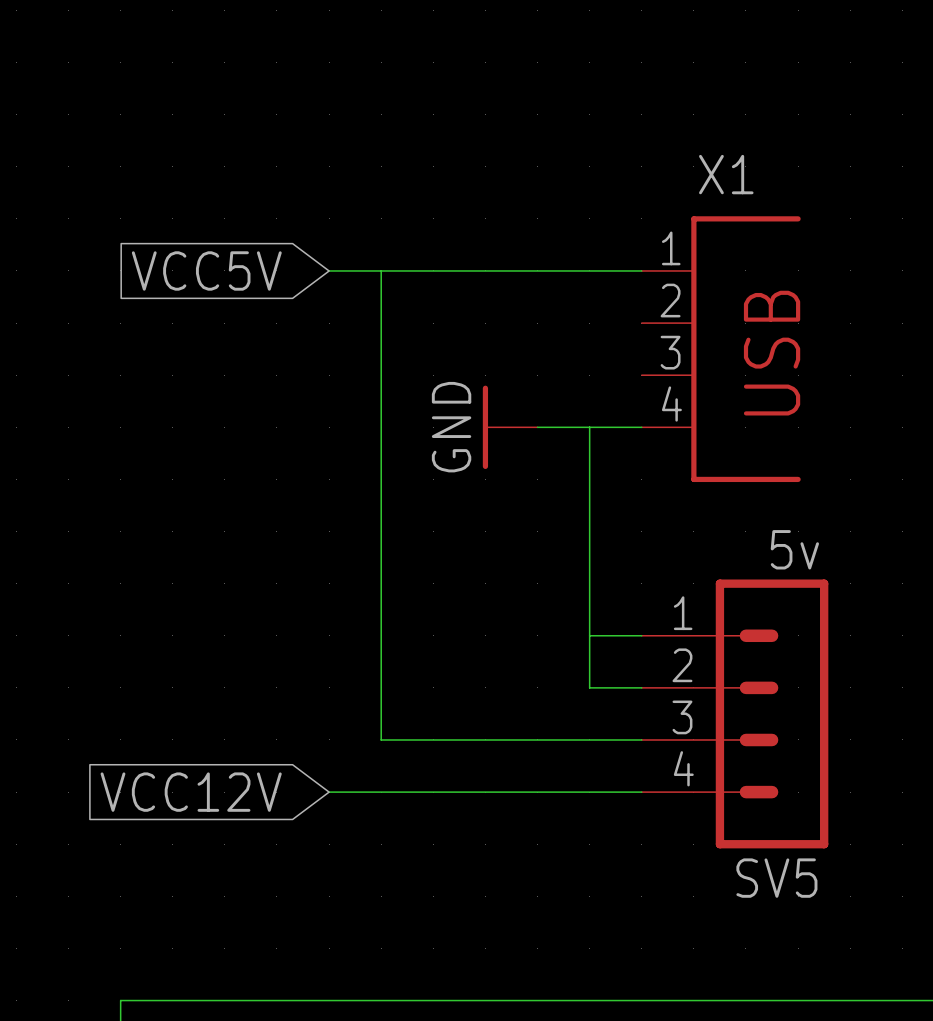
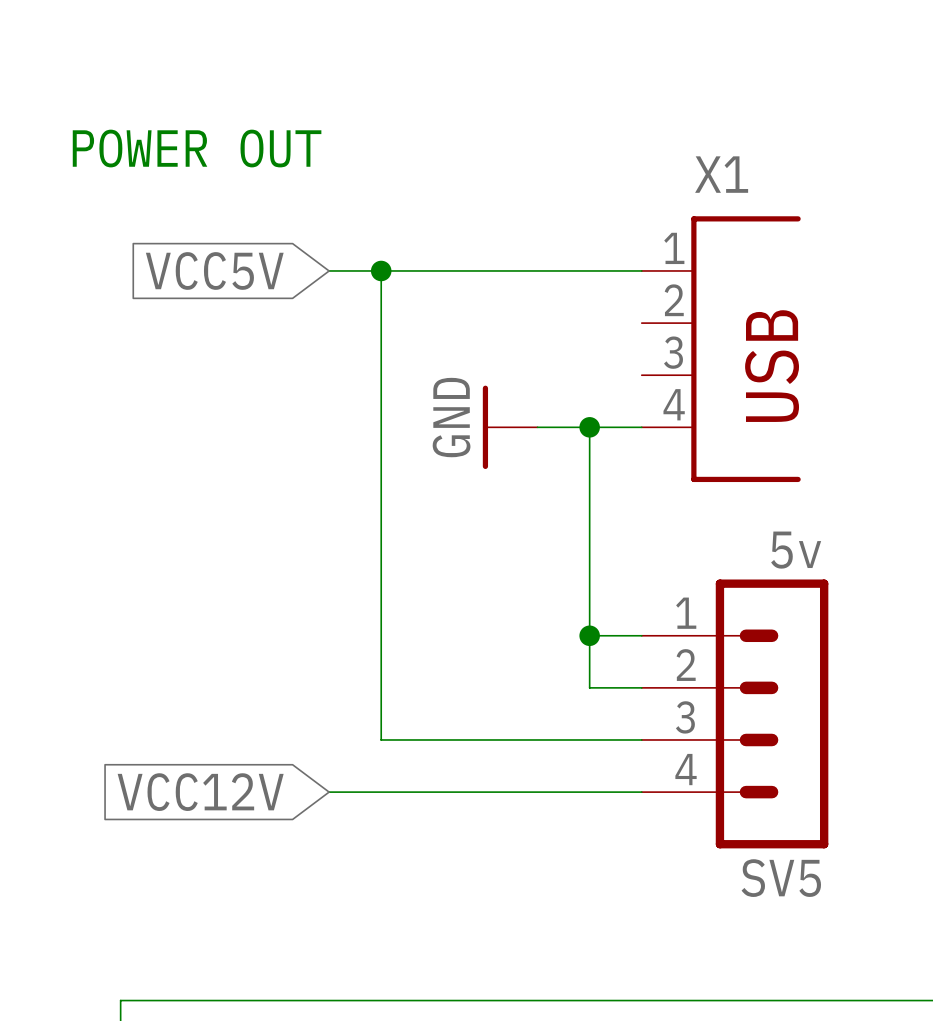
text: none -> POWER OUT (197, 148)
junction: none -> (381, 270)
junction: none -> (589, 427)
junction: none -> (589, 635)

